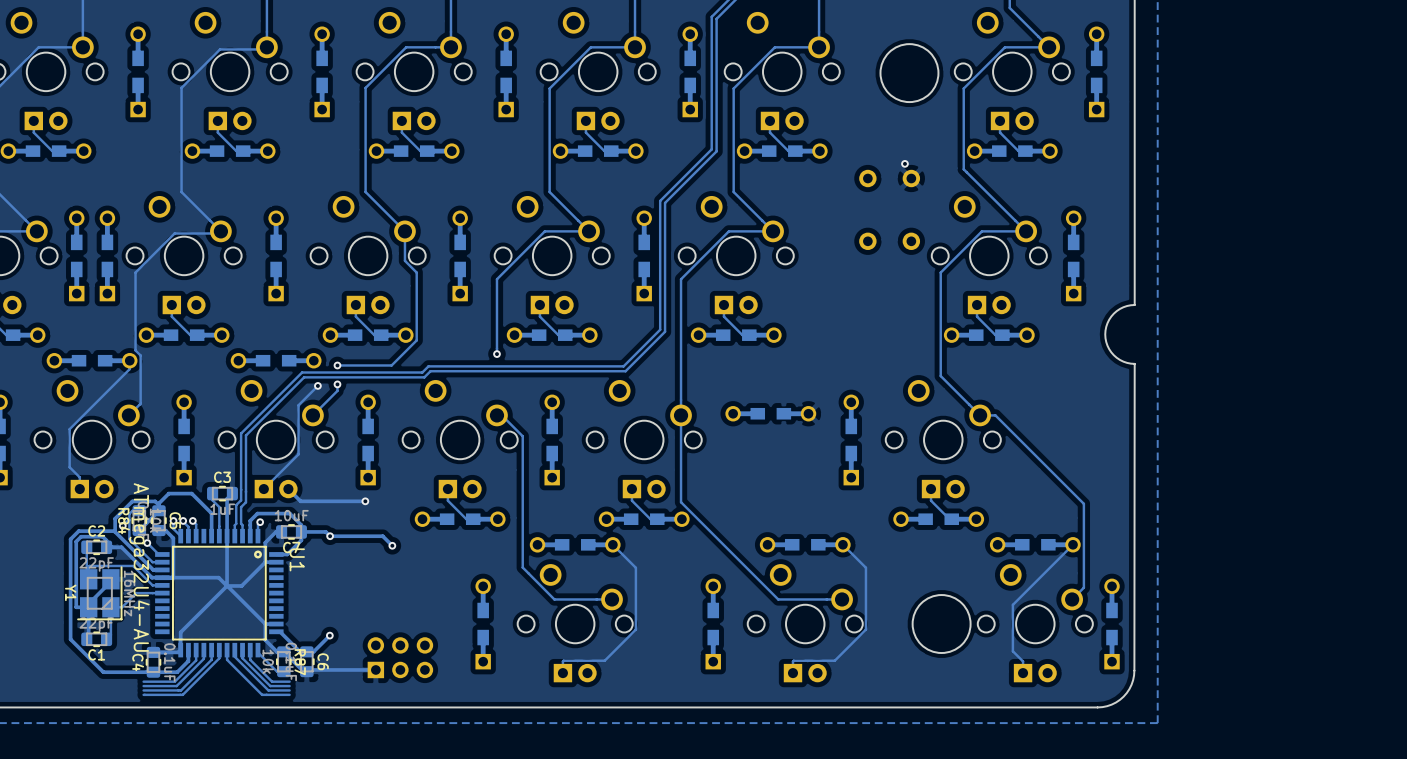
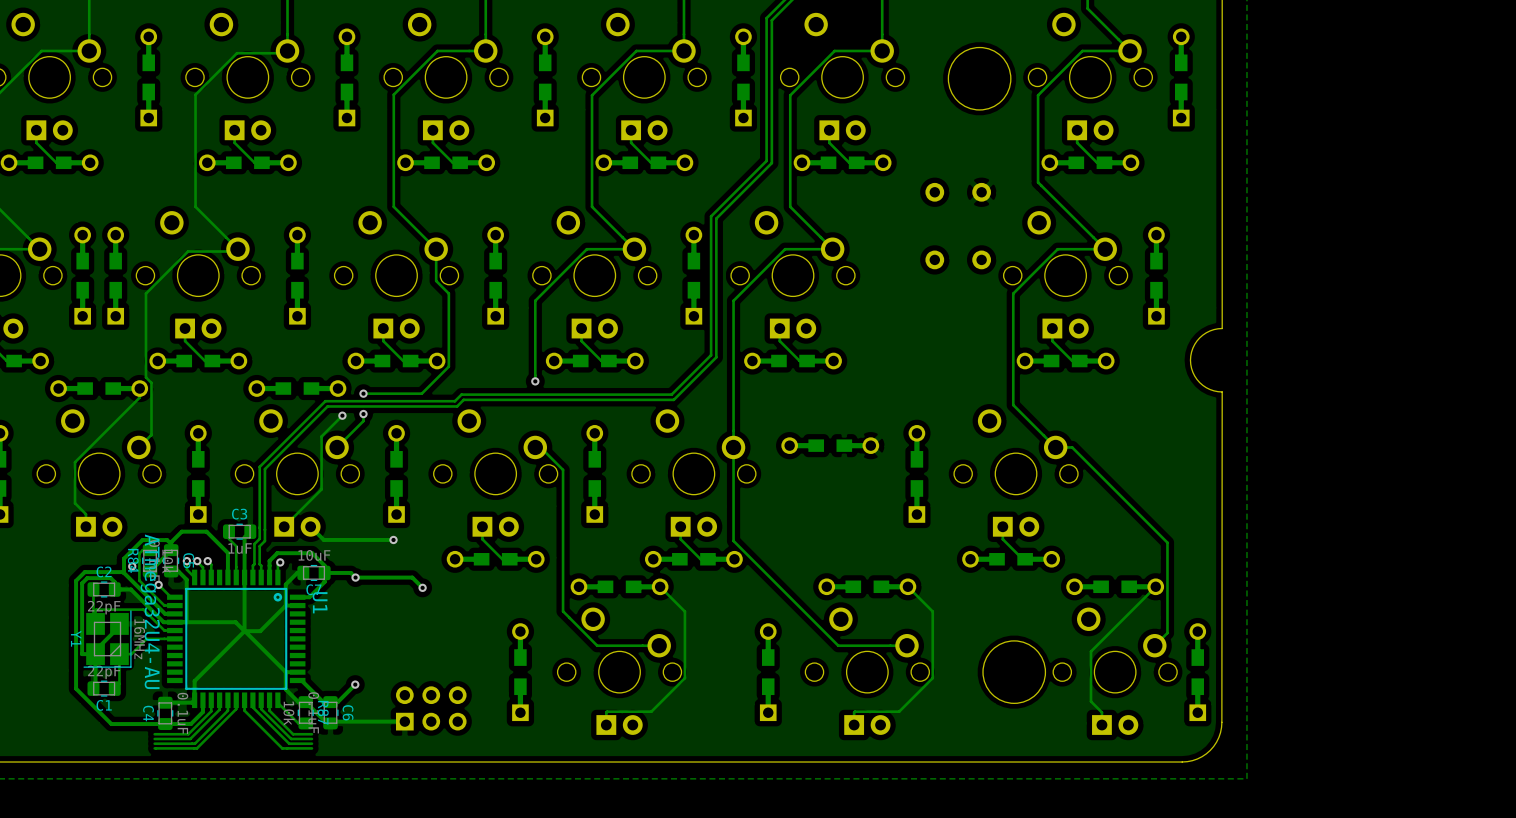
via: (904, 163) -> none

